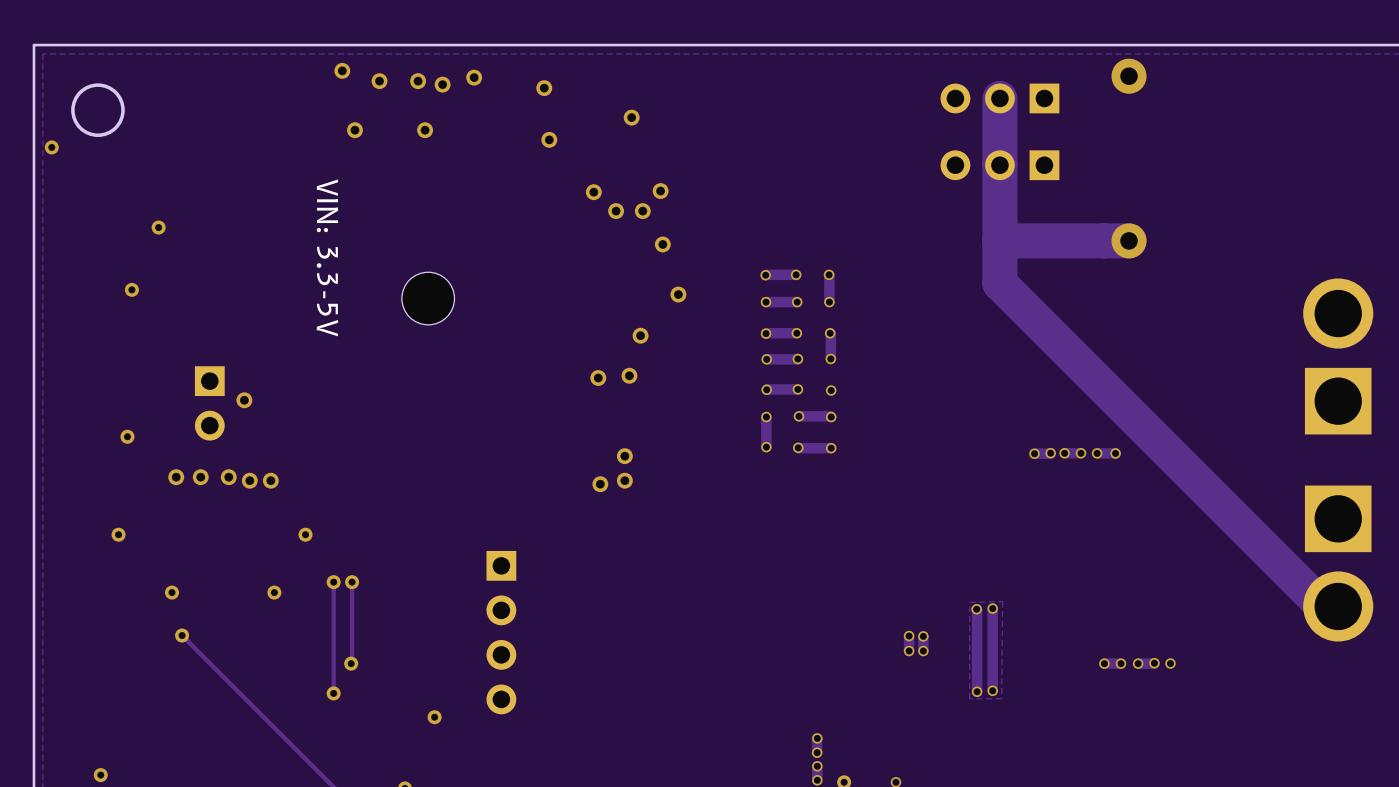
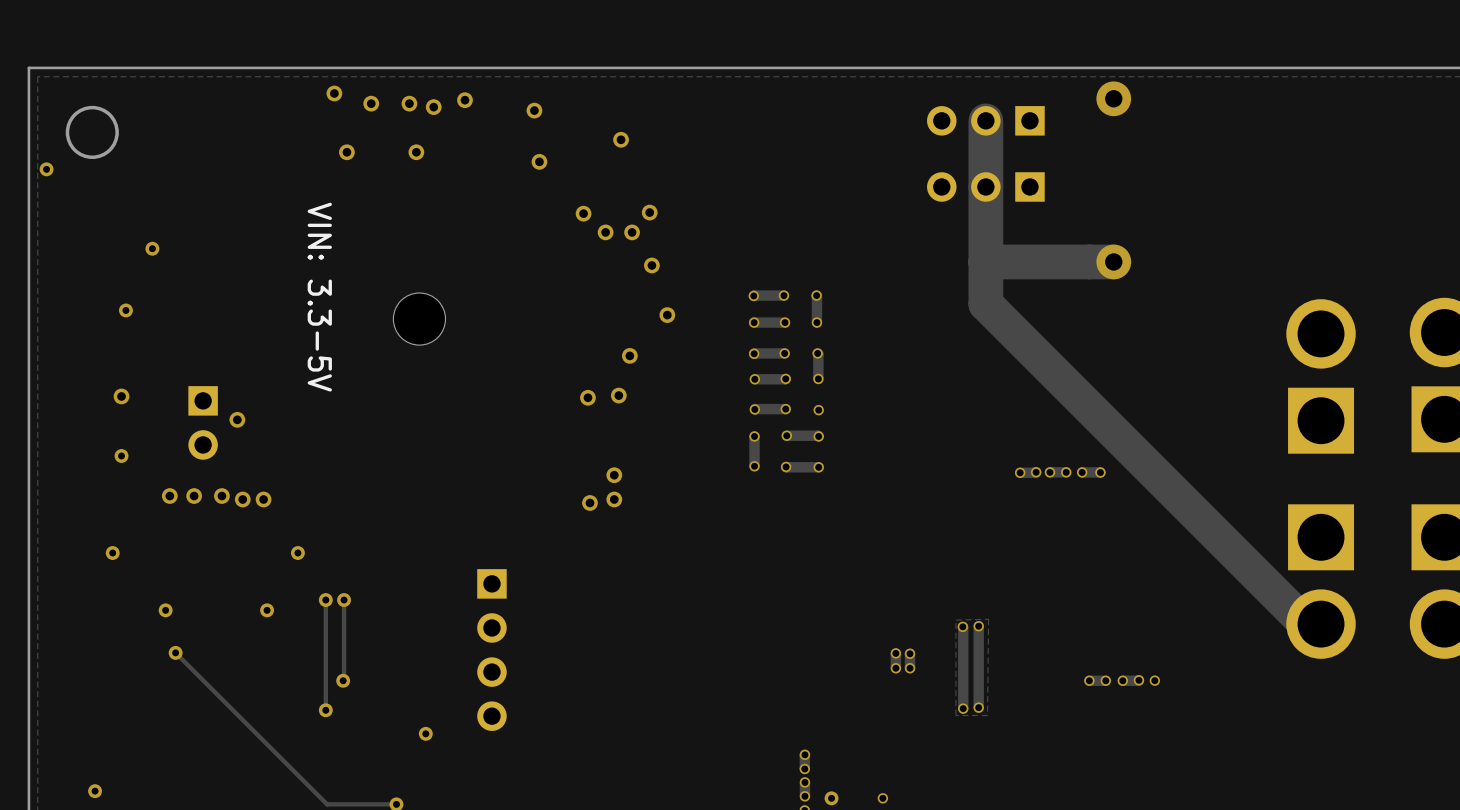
via: none -> (121, 396)

